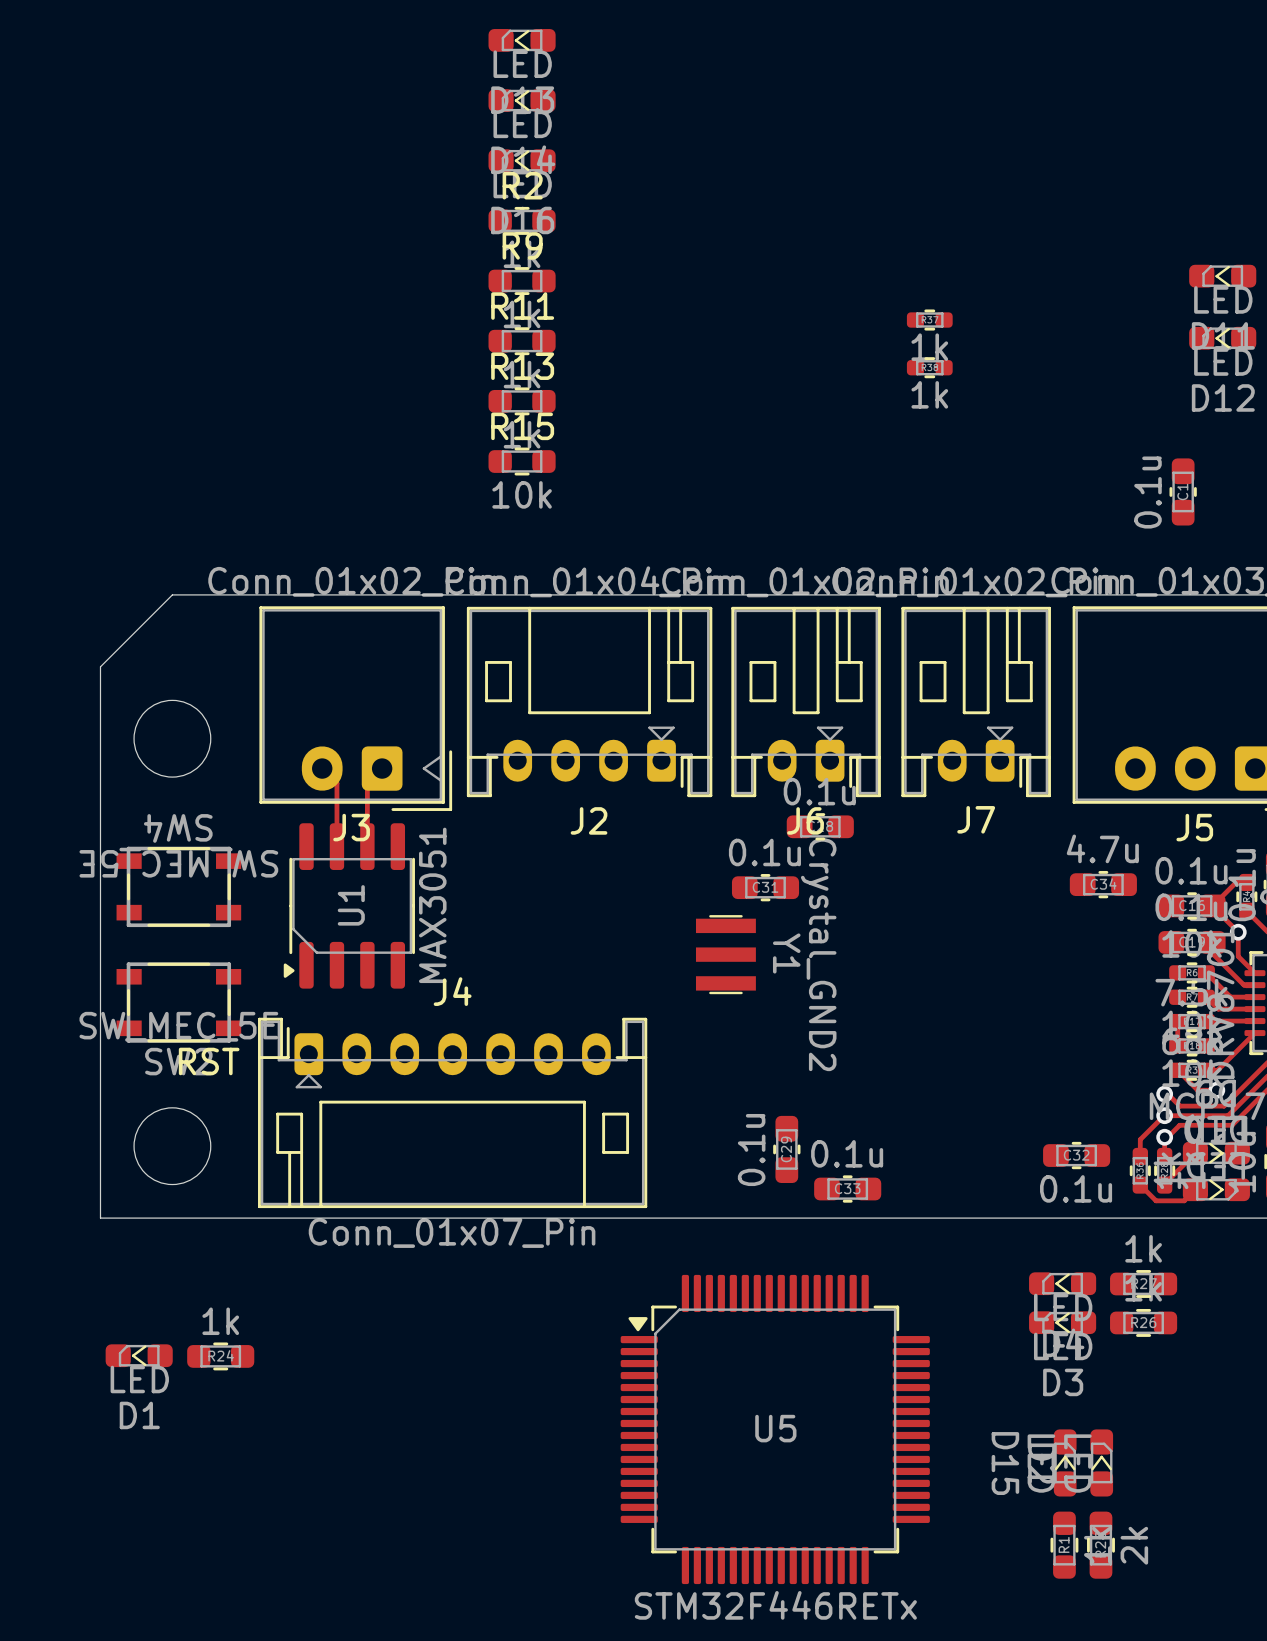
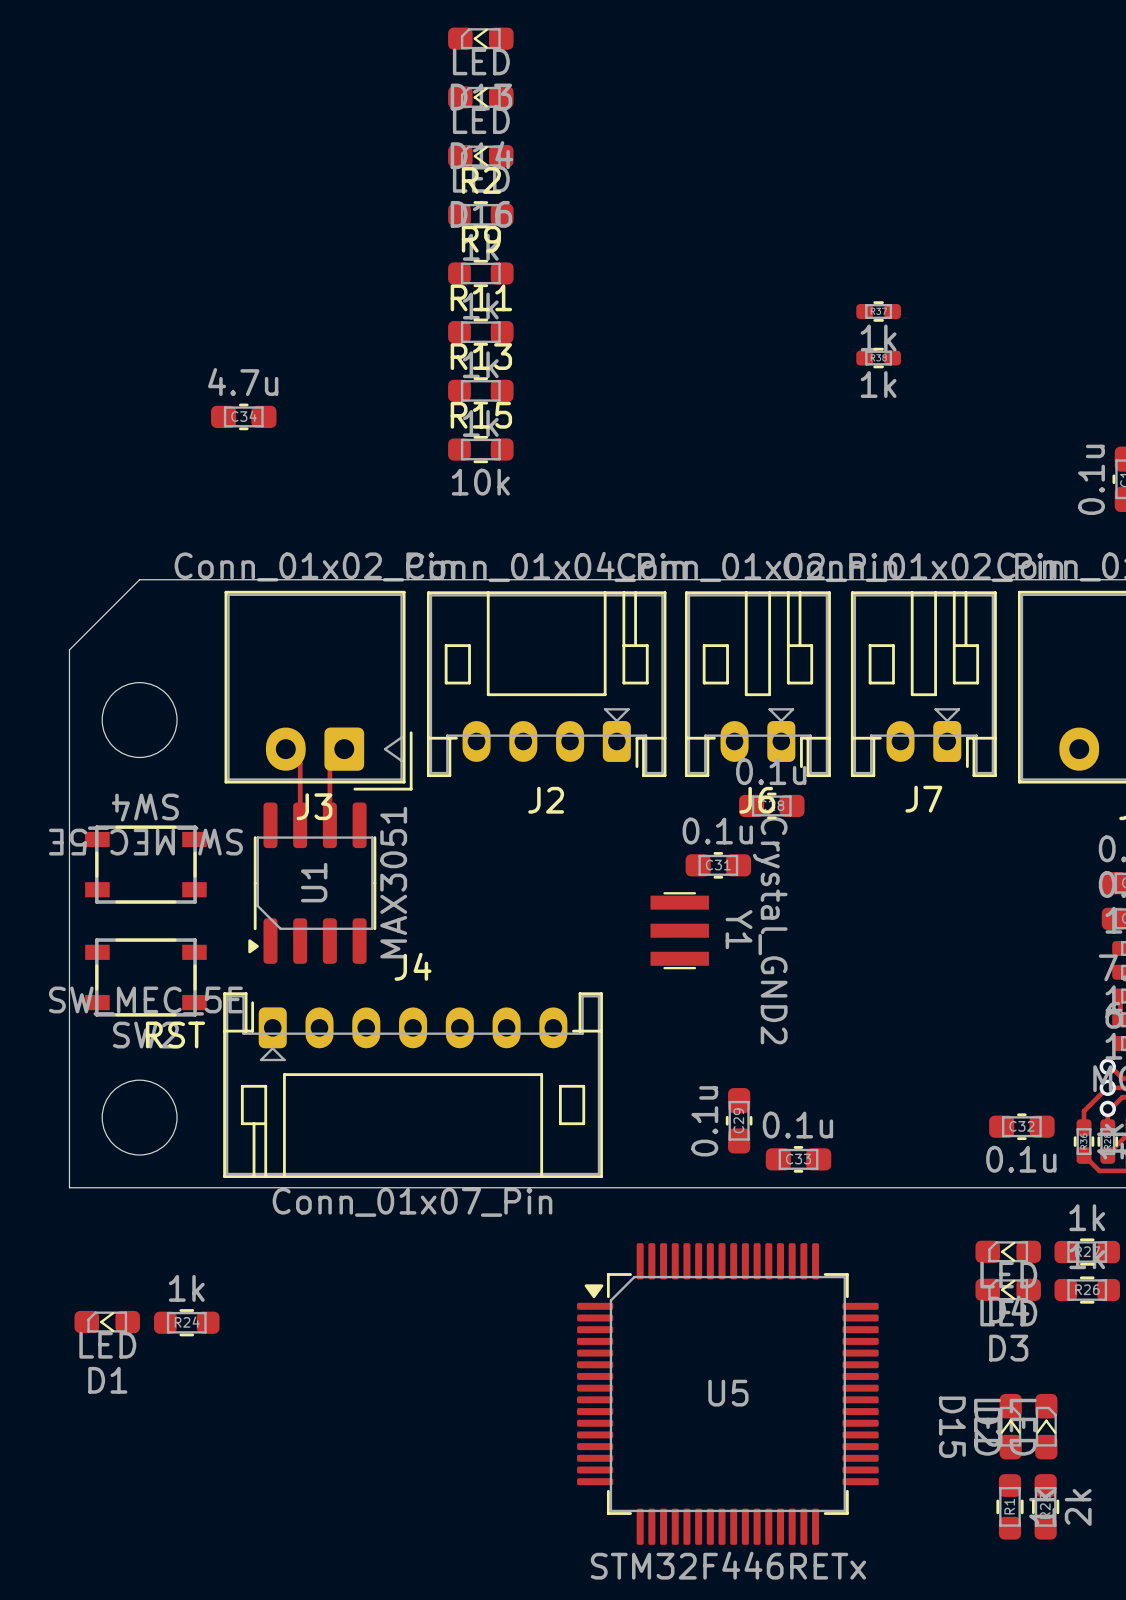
C34 position: (1103, 884) -> (243, 416)

